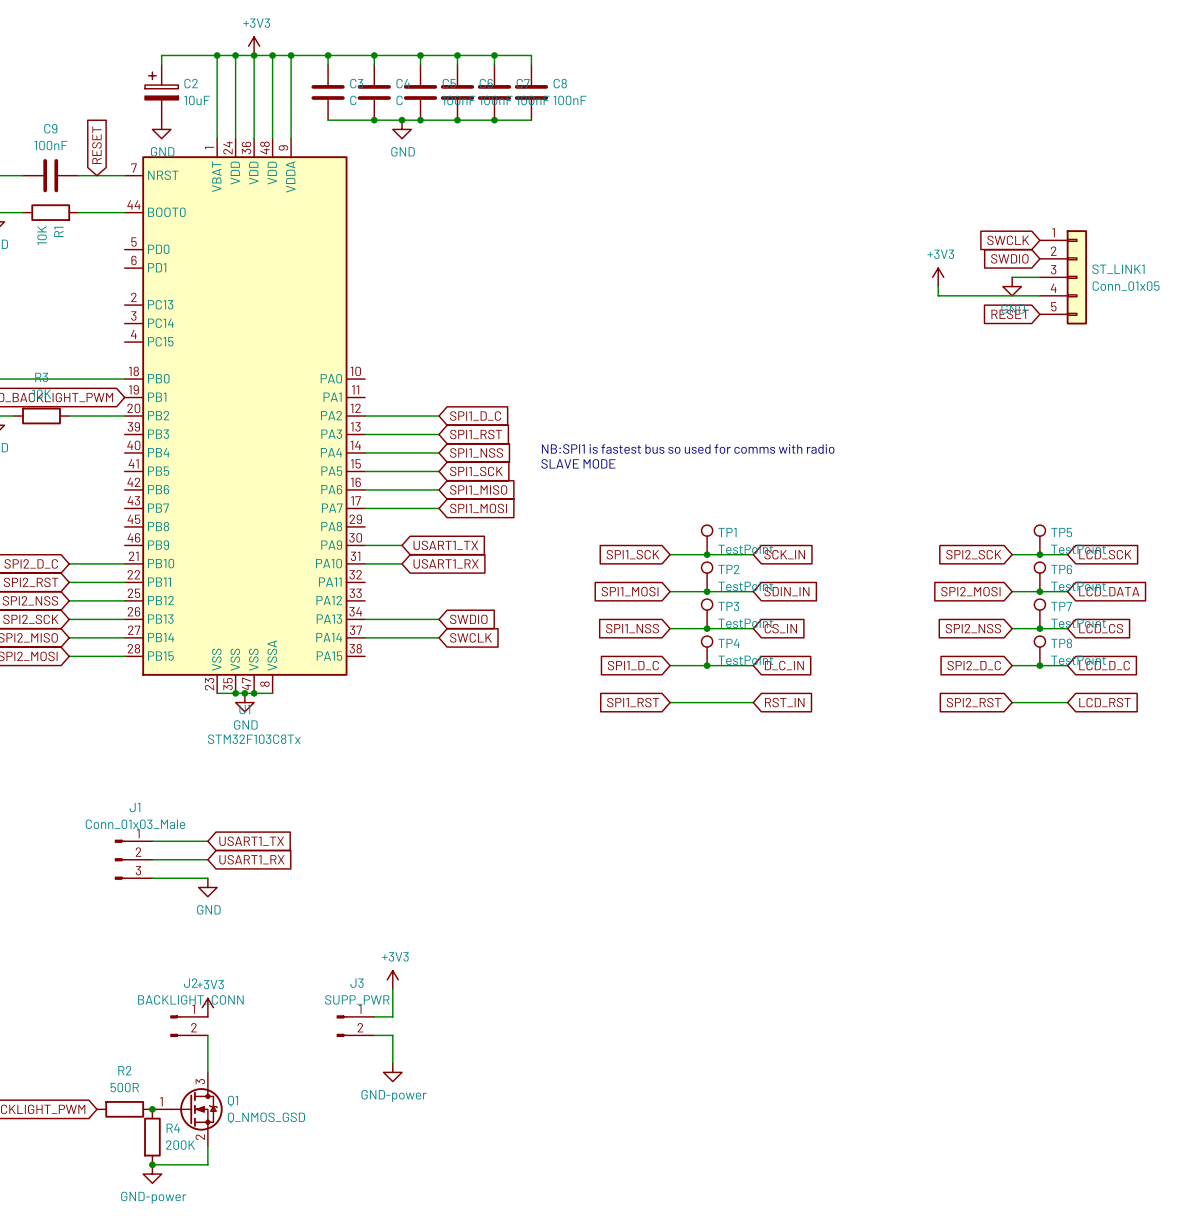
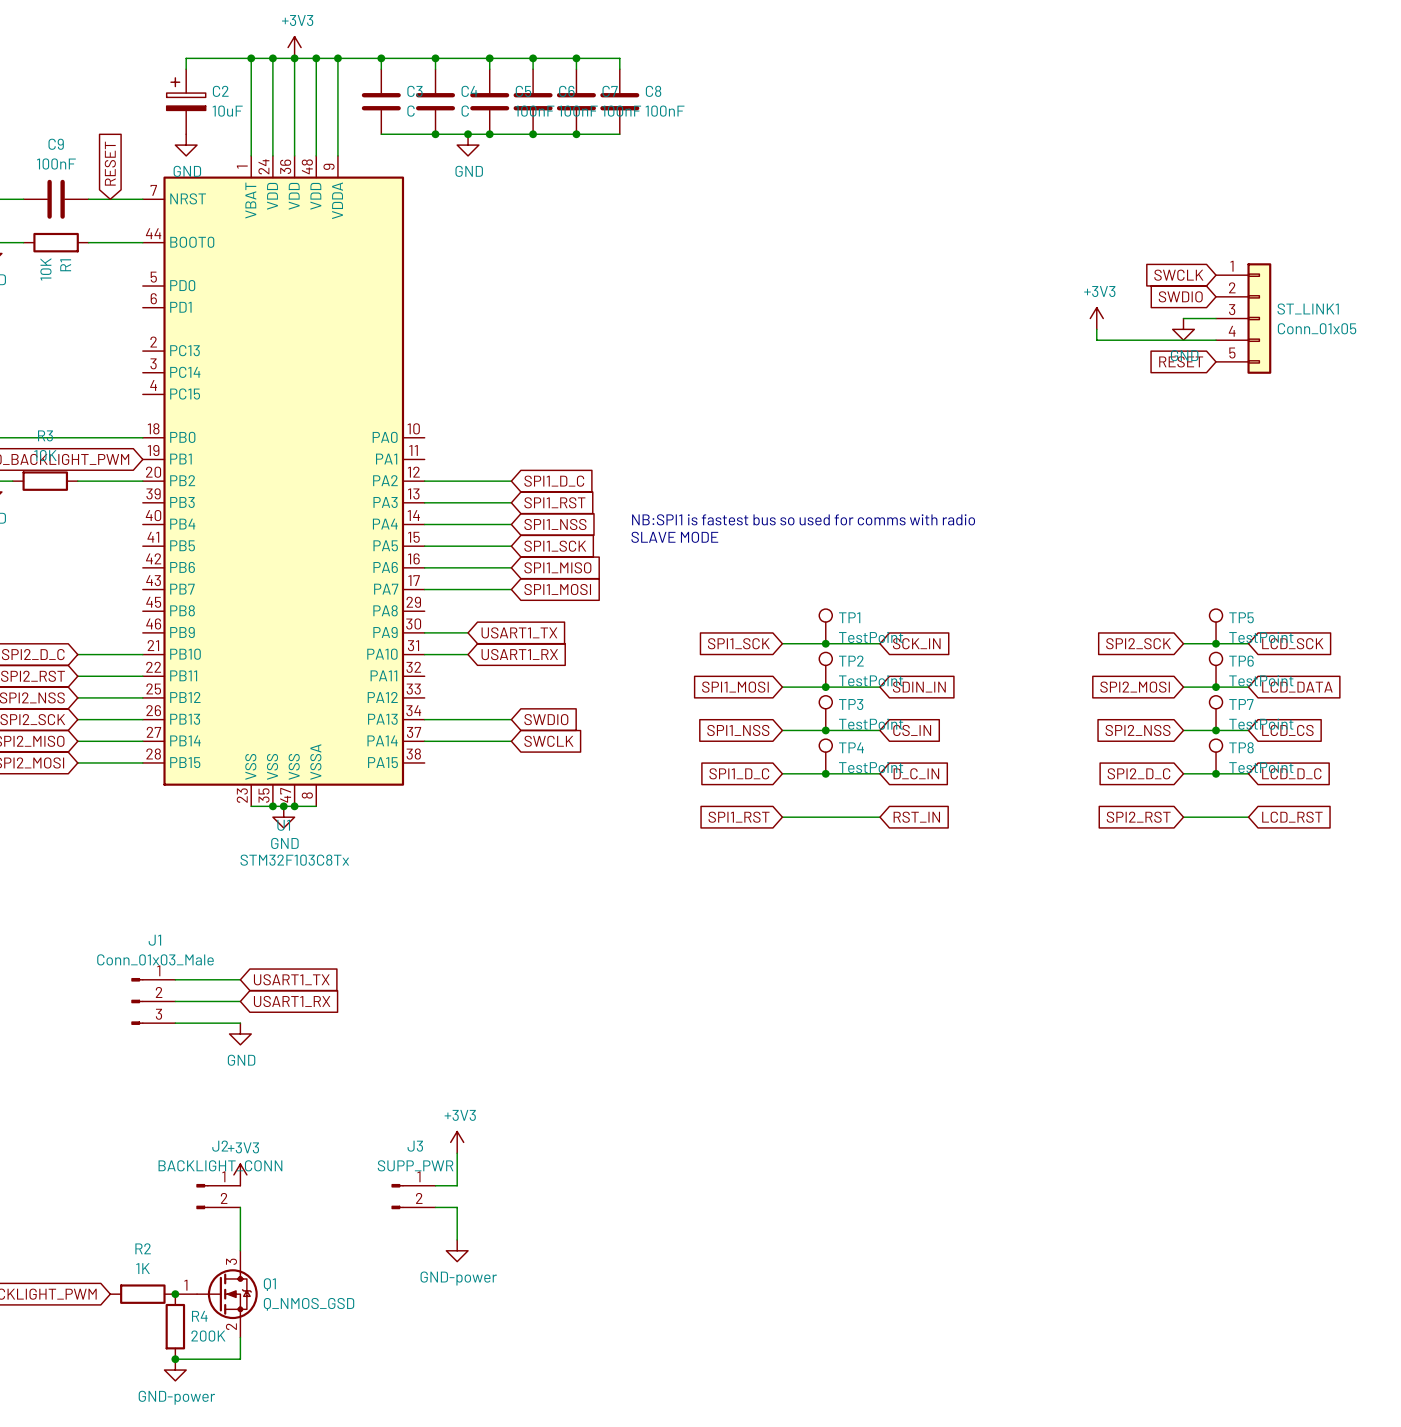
R2 value: 500R (124, 1087) -> 1K (143, 1268)

